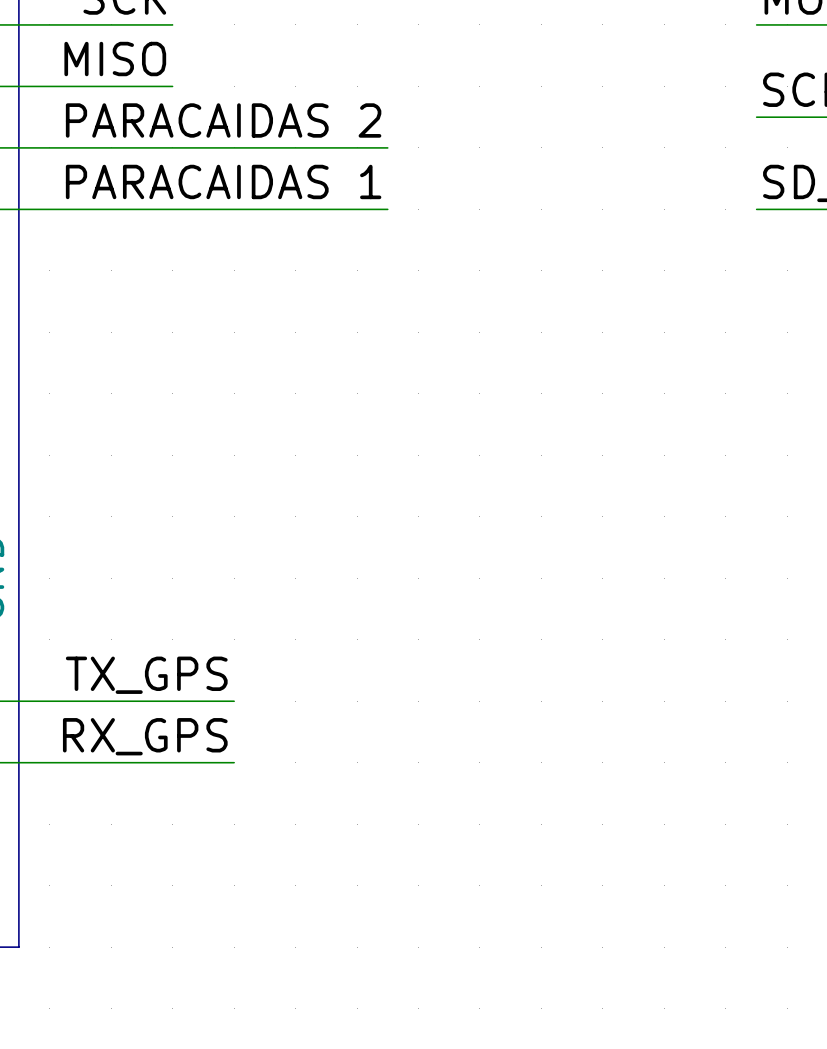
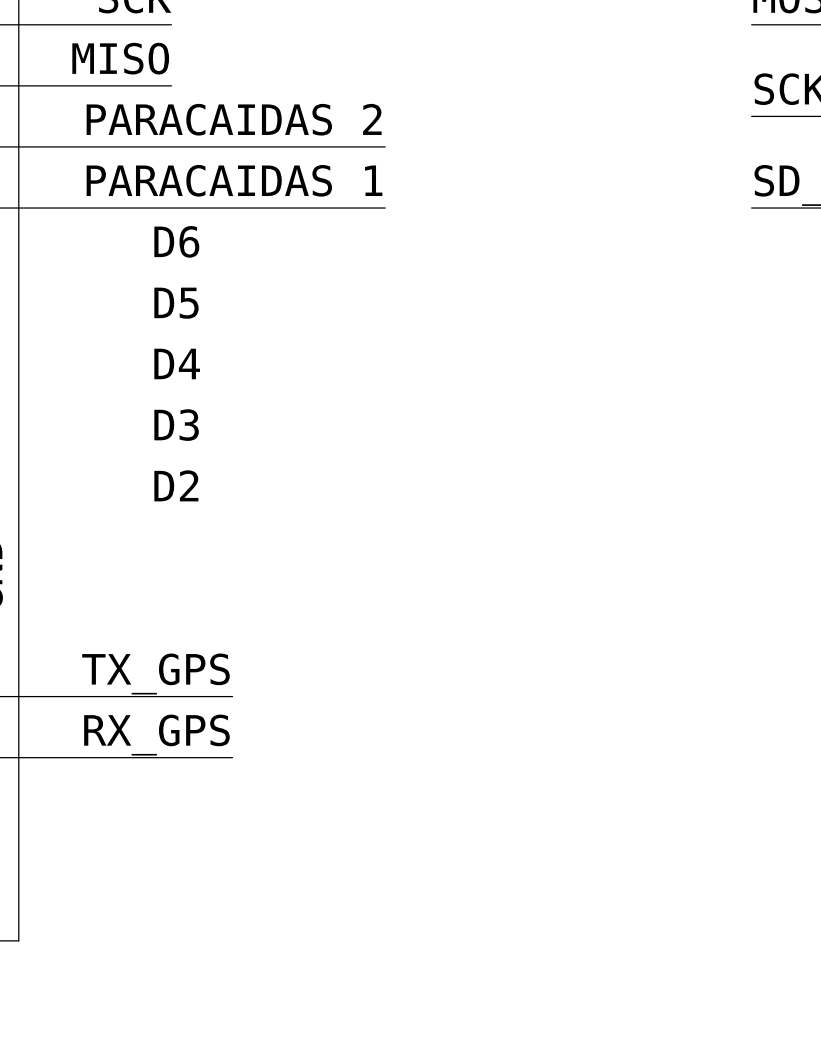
label: none -> D6 (176, 241)
label: none -> D5 (176, 303)
label: none -> D4 (177, 363)
label: none -> D3 (176, 425)
label: none -> D2 (176, 485)

